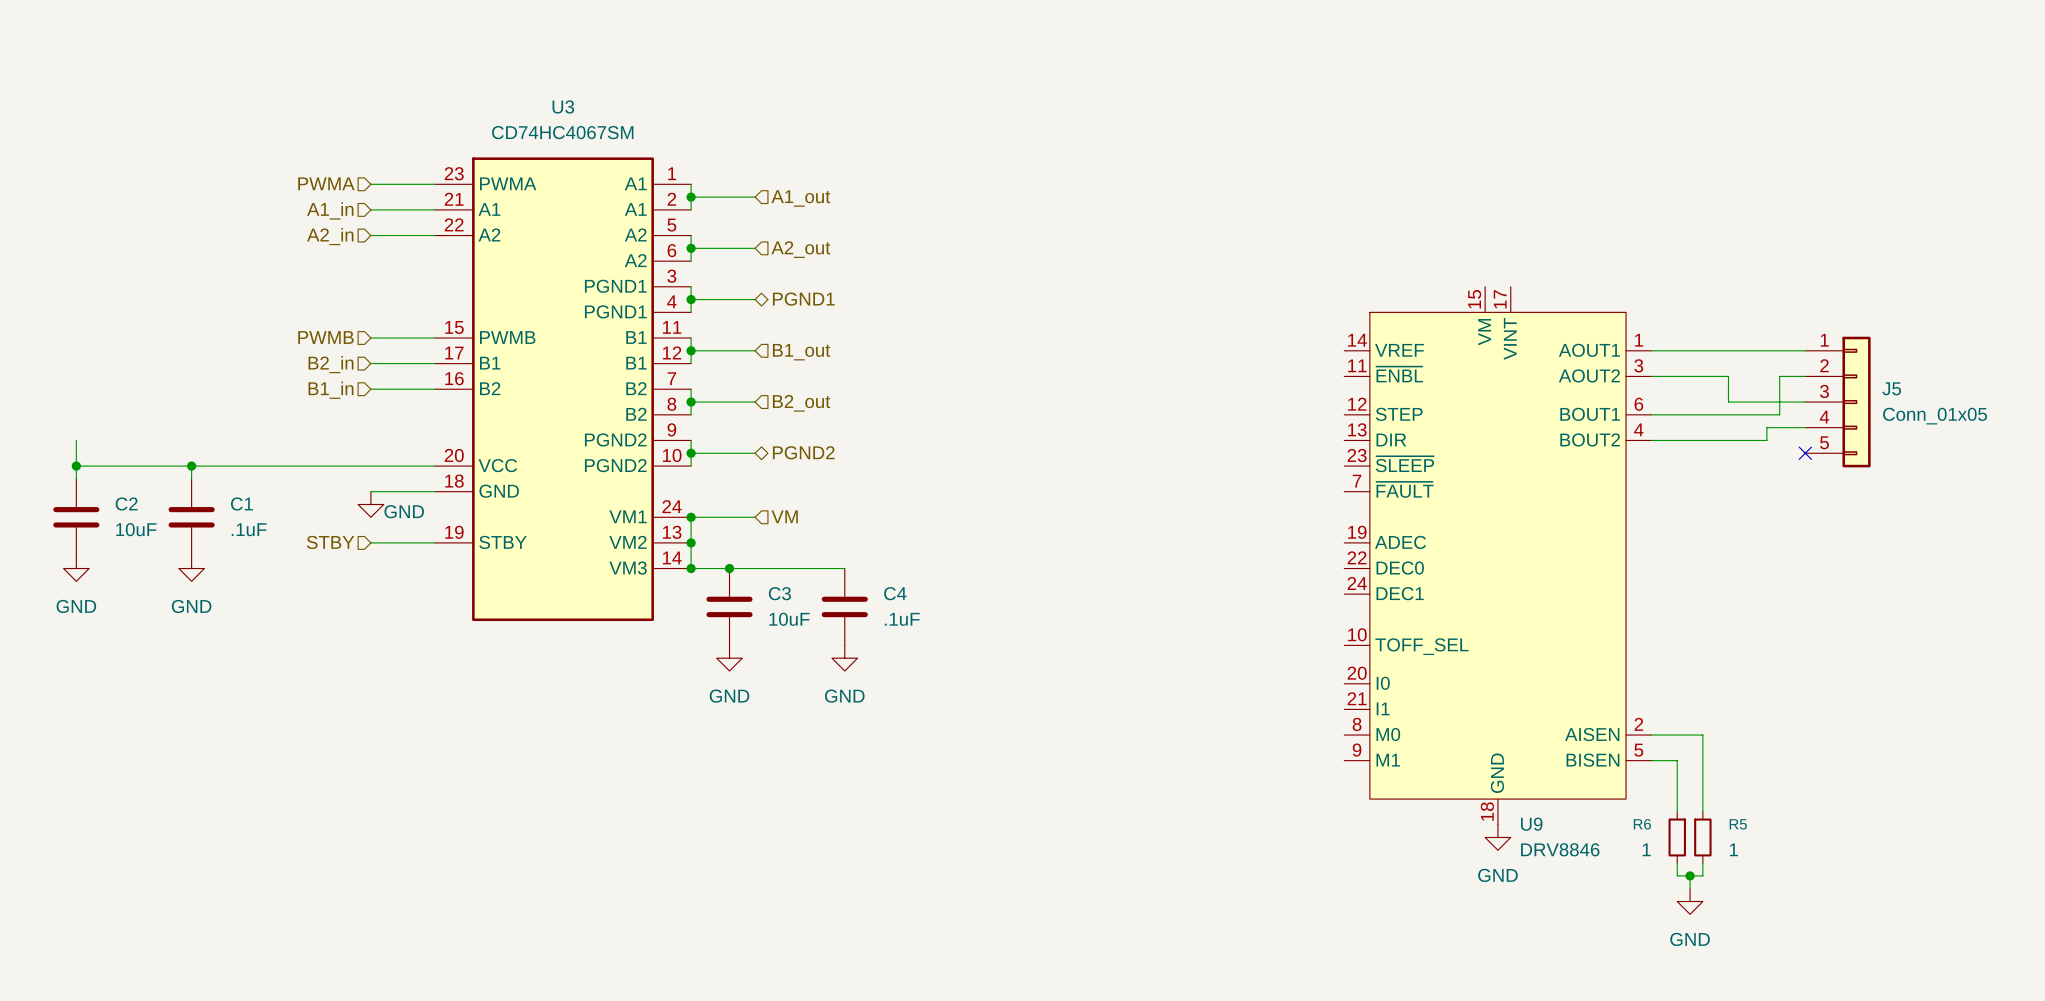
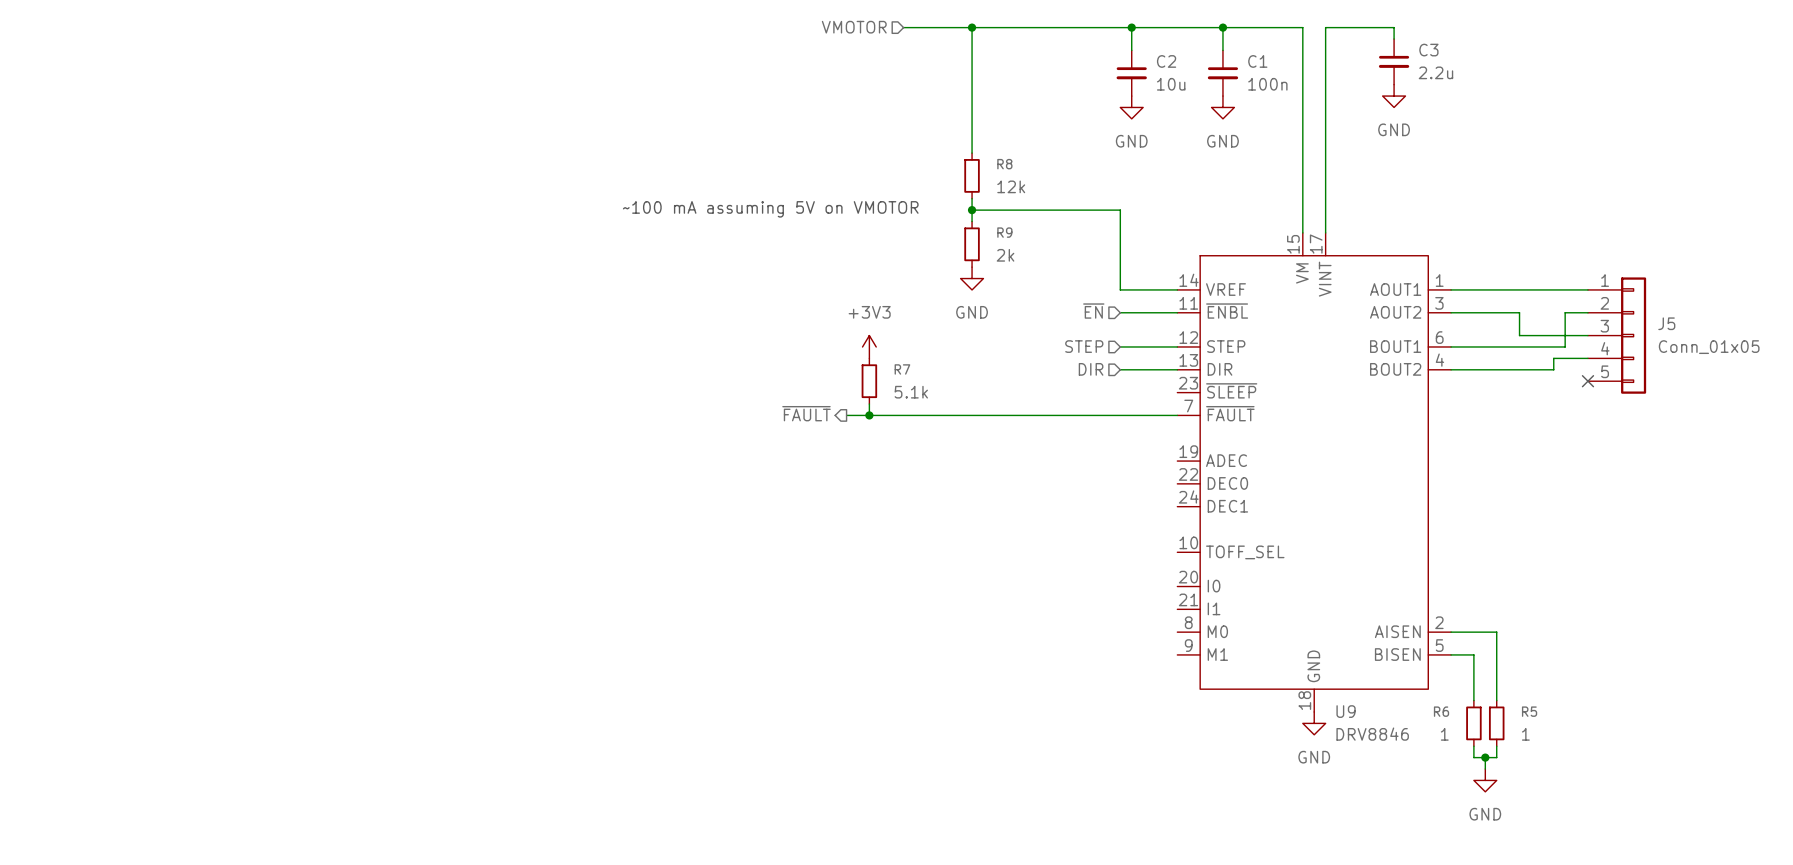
hierarchical label: none -> VMOTOR (854, 27)
wire: none -> (903, 27) (1302, 27) (1302, 232)
wire: none -> (972, 27) (972, 153)
junction: none -> (972, 27)
wire: none -> (1131, 27) (1131, 50)
junction: none -> (1131, 27)
wire: none -> (1222, 27) (1222, 50)
junction: none -> (1222, 27)
wire: none -> (1394, 39) (1394, 27) (1325, 27) (1325, 232)
power symbol: none -> GND (1394, 96)
power symbol: none -> GND (1131, 107)
power symbol: none -> GND (1222, 107)
hierarchical label: PWMA (326, 183) -> none
wire: (370, 184) (434, 184) -> none
wire: (691, 184) (691, 209) -> none
wire: (691, 197) (755, 197) -> none
junction: (691, 197) -> none
hierarchical label: A1_out (800, 198) -> none
wire: (370, 209) (434, 209) -> none
hierarchical label: A1_in (330, 210) -> none
R8: none -> 12k (972, 175)
wire: (370, 235) (434, 235) -> none
wire: (691, 235) (691, 261) -> none
hierarchical label: A2_in (330, 236) -> none
wire: (691, 248) (755, 248) -> none
junction: (691, 248) -> none
wire: none -> (972, 198) (972, 221)
hierarchical label: A2_out (800, 249) -> none
text: none -> ~100 mA assuming 5V on VMOTOR (770, 209)
wire: none -> (972, 210) (1120, 210) (1120, 289) (1177, 289)
junction: none -> (972, 210)
wire: (691, 286) (691, 312) -> none
wire: (691, 299) (755, 299) -> none
junction: (691, 299) -> none
hierarchical label: PGND1 (803, 299) -> none
R9: none -> 2k (972, 244)
hierarchical label: PWMB (325, 337) -> none
wire: (370, 338) (434, 338) -> none
wire: (691, 338) (691, 363) -> none
power symbol: none -> GND (972, 278)
wire: (691, 350) (755, 350) -> none
junction: (691, 350) -> none
hierarchical label: B1_out (801, 352) -> none
wire: (370, 363) (434, 363) -> none
hierarchical label: B2_in (331, 364) -> none
hierarchical label: none -> ~{EN} (1093, 311)
wire: none -> (1120, 312) (1177, 312)
wire: (370, 389) (434, 389) -> none
U3: CD74HC4067SM (563, 389) -> none
wire: (691, 389) (691, 414) -> none
hierarchical label: B1_in (331, 390) -> none
wire: (691, 402) (755, 402) -> none
junction: (691, 402) -> none
hierarchical label: B2_out (801, 403) -> none
power symbol: none -> +3V3 (869, 346)
hierarchical label: none -> STEP (1084, 346)
wire: none -> (1120, 346) (1177, 346)
hierarchical label: none -> DIR (1091, 369)
wire: (76, 440) (76, 478) -> none
wire: (691, 440) (691, 466) -> none
wire: none -> (1120, 369) (1177, 369)
hierarchical label: PGND2 (803, 452) -> none
wire: (691, 453) (755, 453) -> none
junction: (691, 453) -> none
R7: none -> 5.1k (869, 381)
wire: (76, 466) (434, 466) -> none
junction: (76, 466) -> none
wire: (191, 466) (191, 478) -> none
junction: (191, 466) -> none
C2 symbol: [53, 478, 100, 556] -> [1116, 50, 1147, 97]
C1 symbol: [168, 478, 215, 556] -> [1207, 50, 1239, 97]
wire: none -> (869, 404) (869, 415)
hierarchical label: none -> ~{FAULT} (806, 413)
wire: (370, 491) (434, 491) -> none
wire: none -> (846, 415) (1177, 415)
junction: none -> (869, 415)
power symbol: GND (370, 504) -> none
hierarchical label: VM (784, 516) -> none
junction: (691, 517) -> none
wire: (755, 517) (691, 517) (691, 568) (844, 568) -> none
C2 value: 10uF (136, 529) -> 10u (1171, 84)
C1 value: .1uF (249, 529) -> 100n (1267, 84)
hierarchical label: STBY (330, 542) -> none
wire: (370, 542) (434, 542) -> none
junction: (691, 542) -> none
power symbol: GND (76, 568) -> none
power symbol: GND (191, 568) -> none
junction: (691, 568) -> none
C3 symbol: [706, 568, 753, 646] -> [1378, 39, 1410, 85]
junction: (729, 568) -> none
C4: .1uF (844, 606) -> none
C3 value: 10uF (789, 619) -> 2.2u (1435, 72)
power symbol: GND (729, 658) -> none
power symbol: GND (844, 658) -> none

